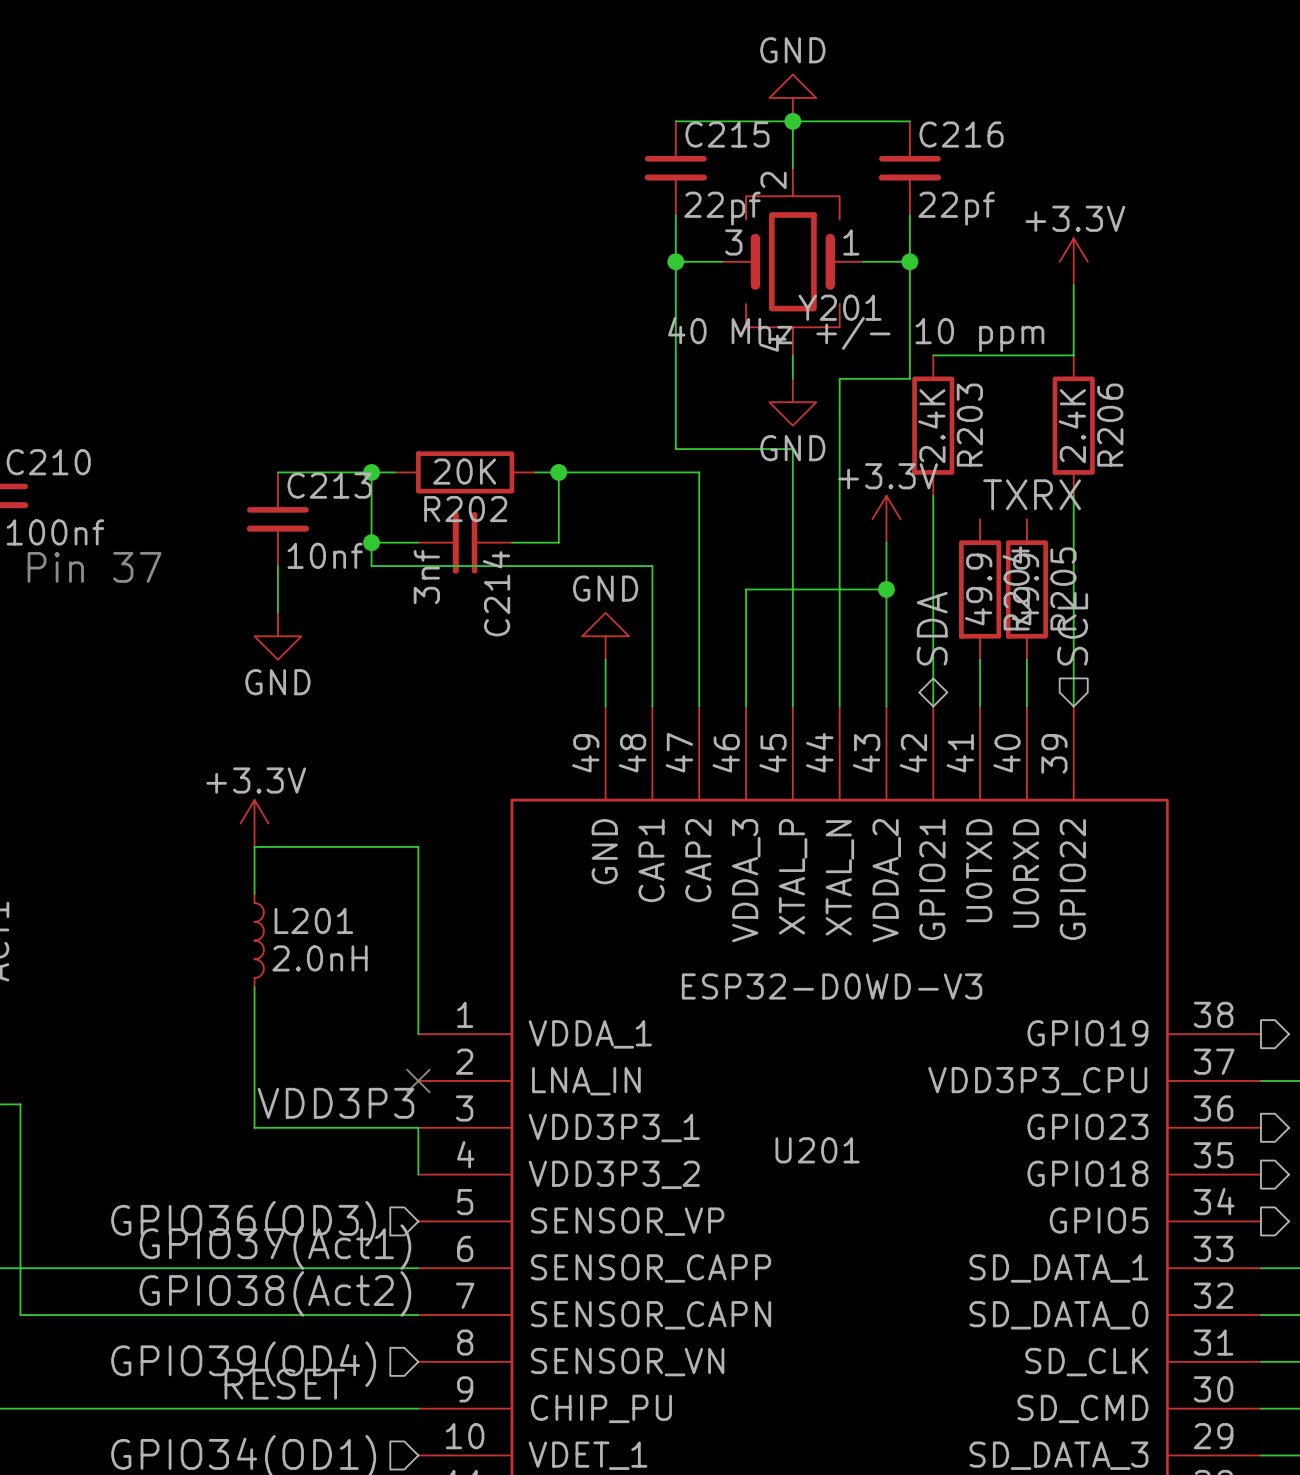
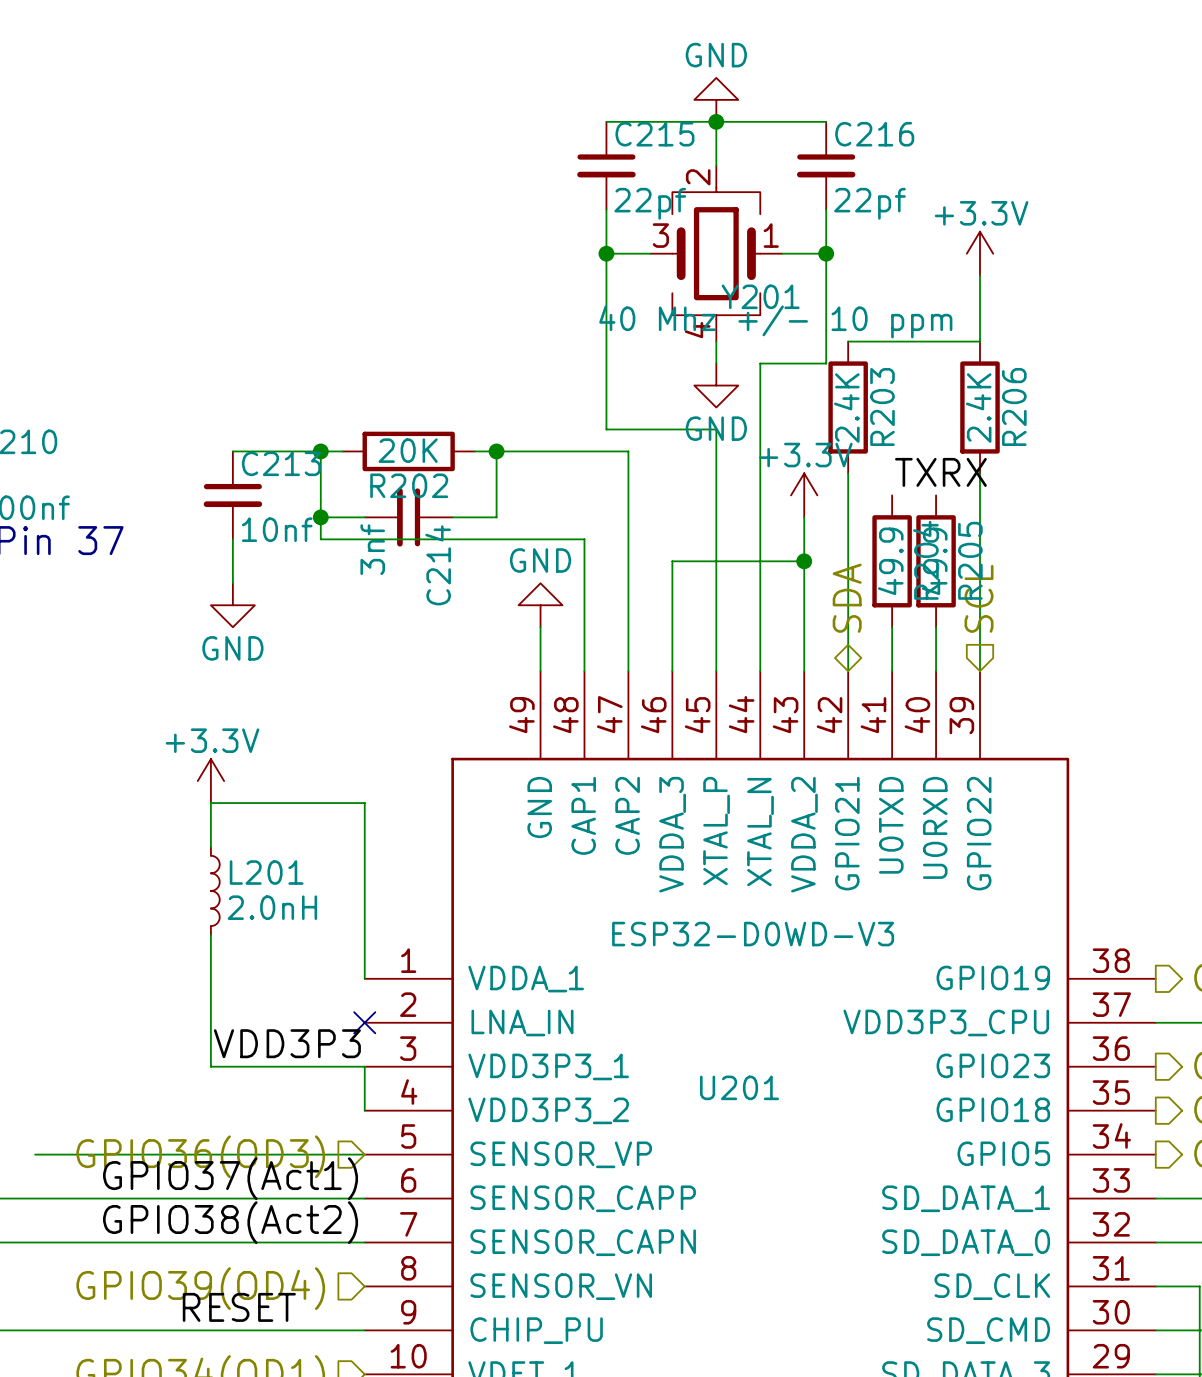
wire: none -> (35, 1154) (364, 1154)

